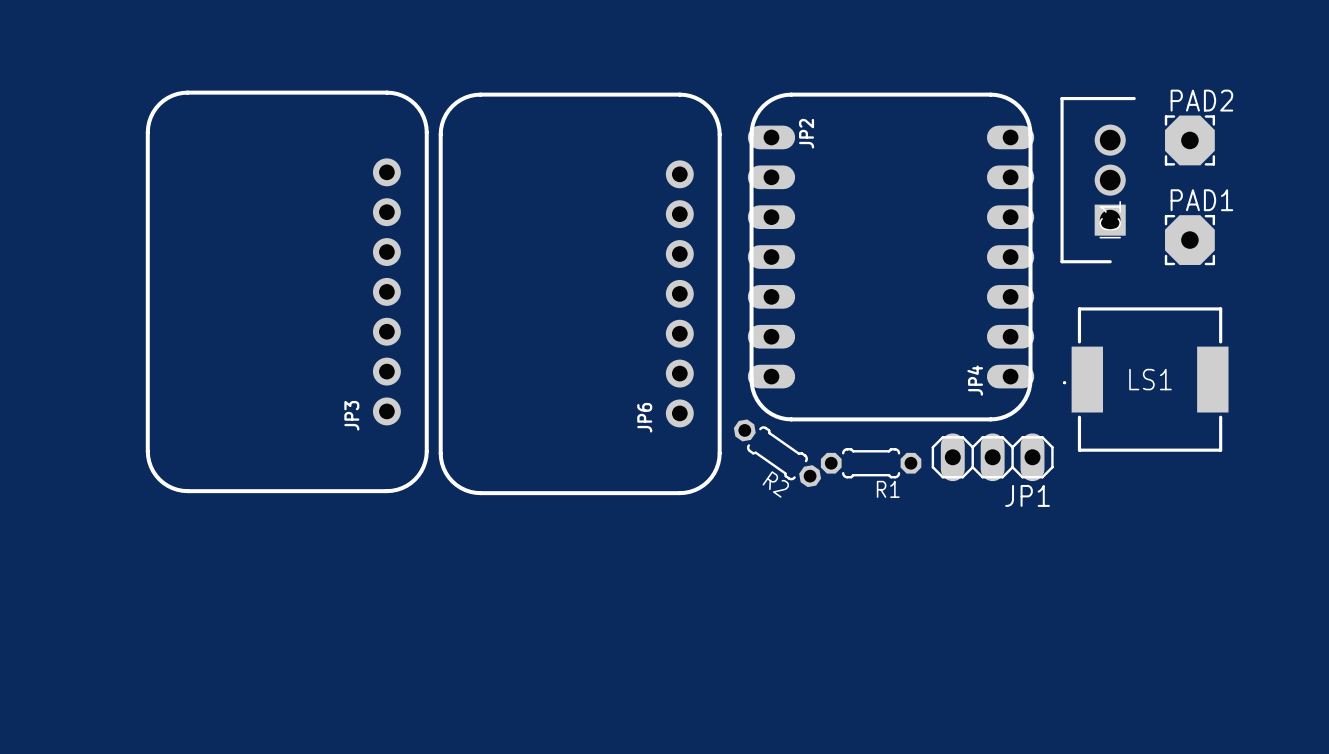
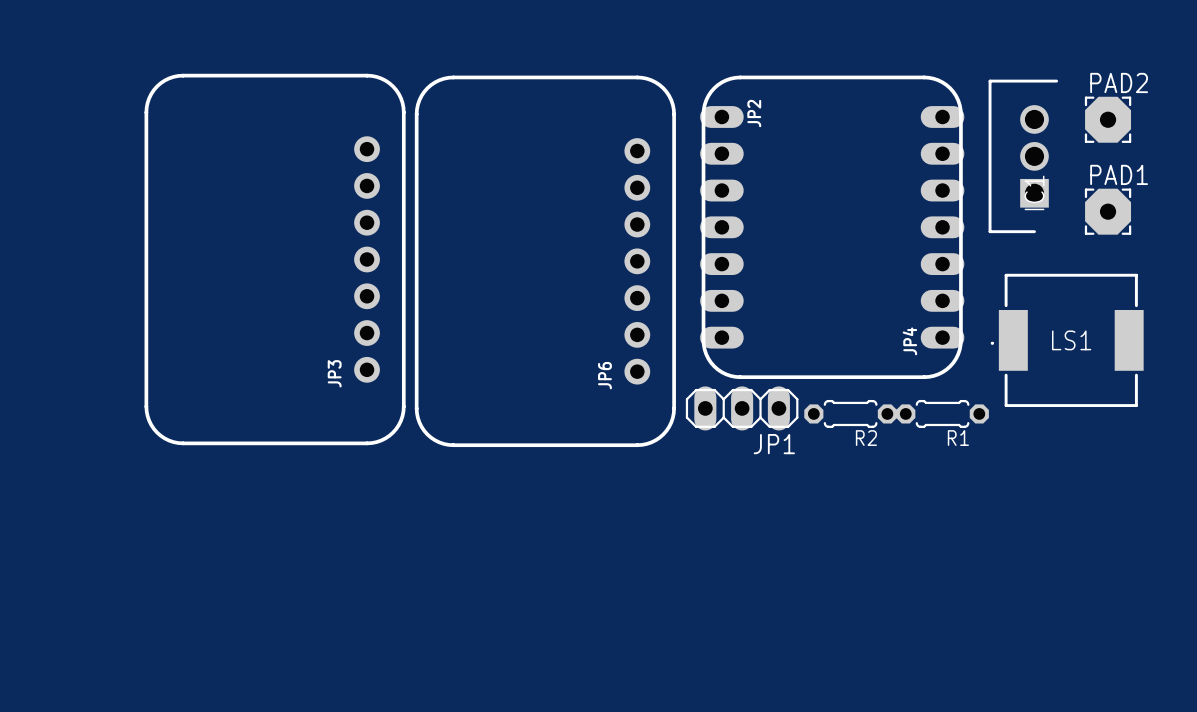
R2 rotation: 0° (777, 453) -> 35° counterclockwise (850, 413)
R2 position: (777, 453) -> (850, 413)
JP1 position: (992, 457) -> (742, 408)
R1 position: (871, 463) -> (942, 413)

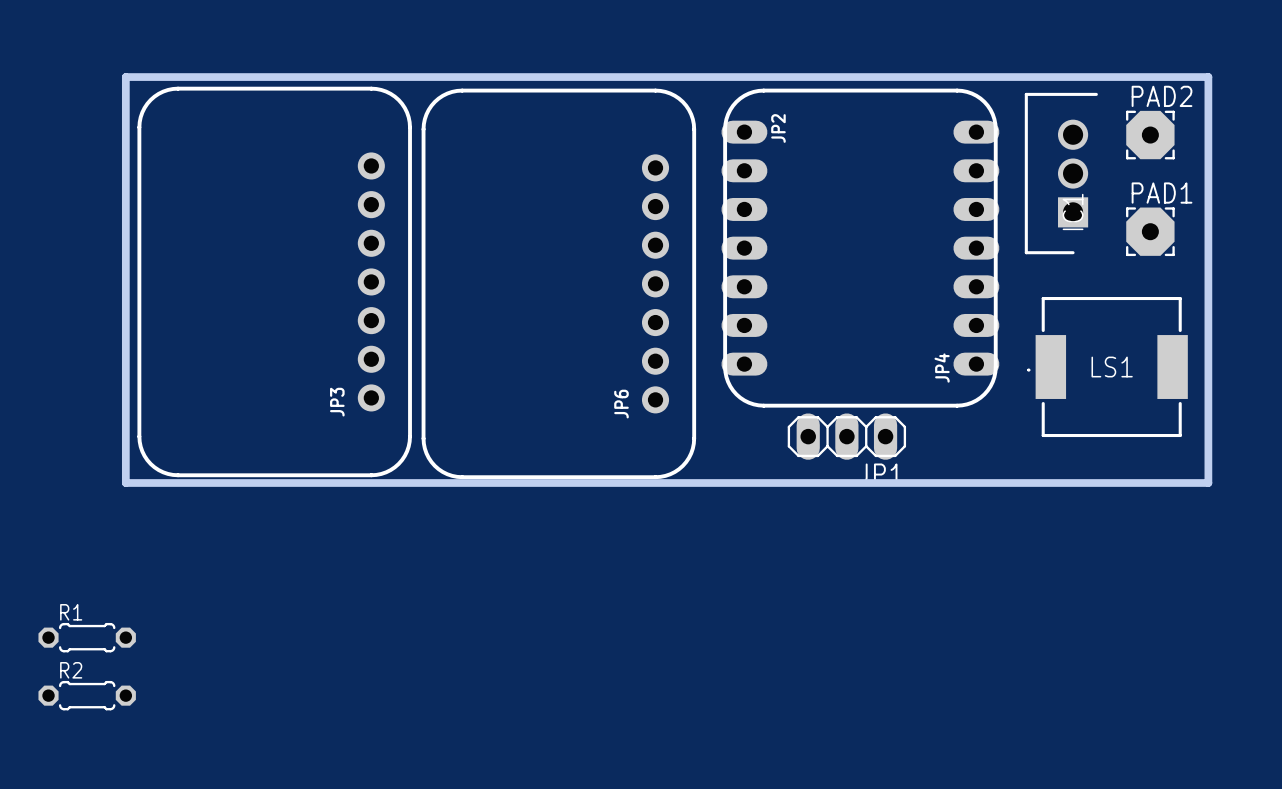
board edge: none -> (125, 77) (1208, 77) (1208, 483) (125, 483) (125, 77)
JP1 position: (742, 408) -> (846, 436)
R2 position: (850, 413) -> (87, 695)
R1 position: (942, 413) -> (87, 637)
R2 name position: R2 (866, 438) -> R2 (71, 670)
R1 name position: R1 (958, 438) -> R1 (71, 612)

